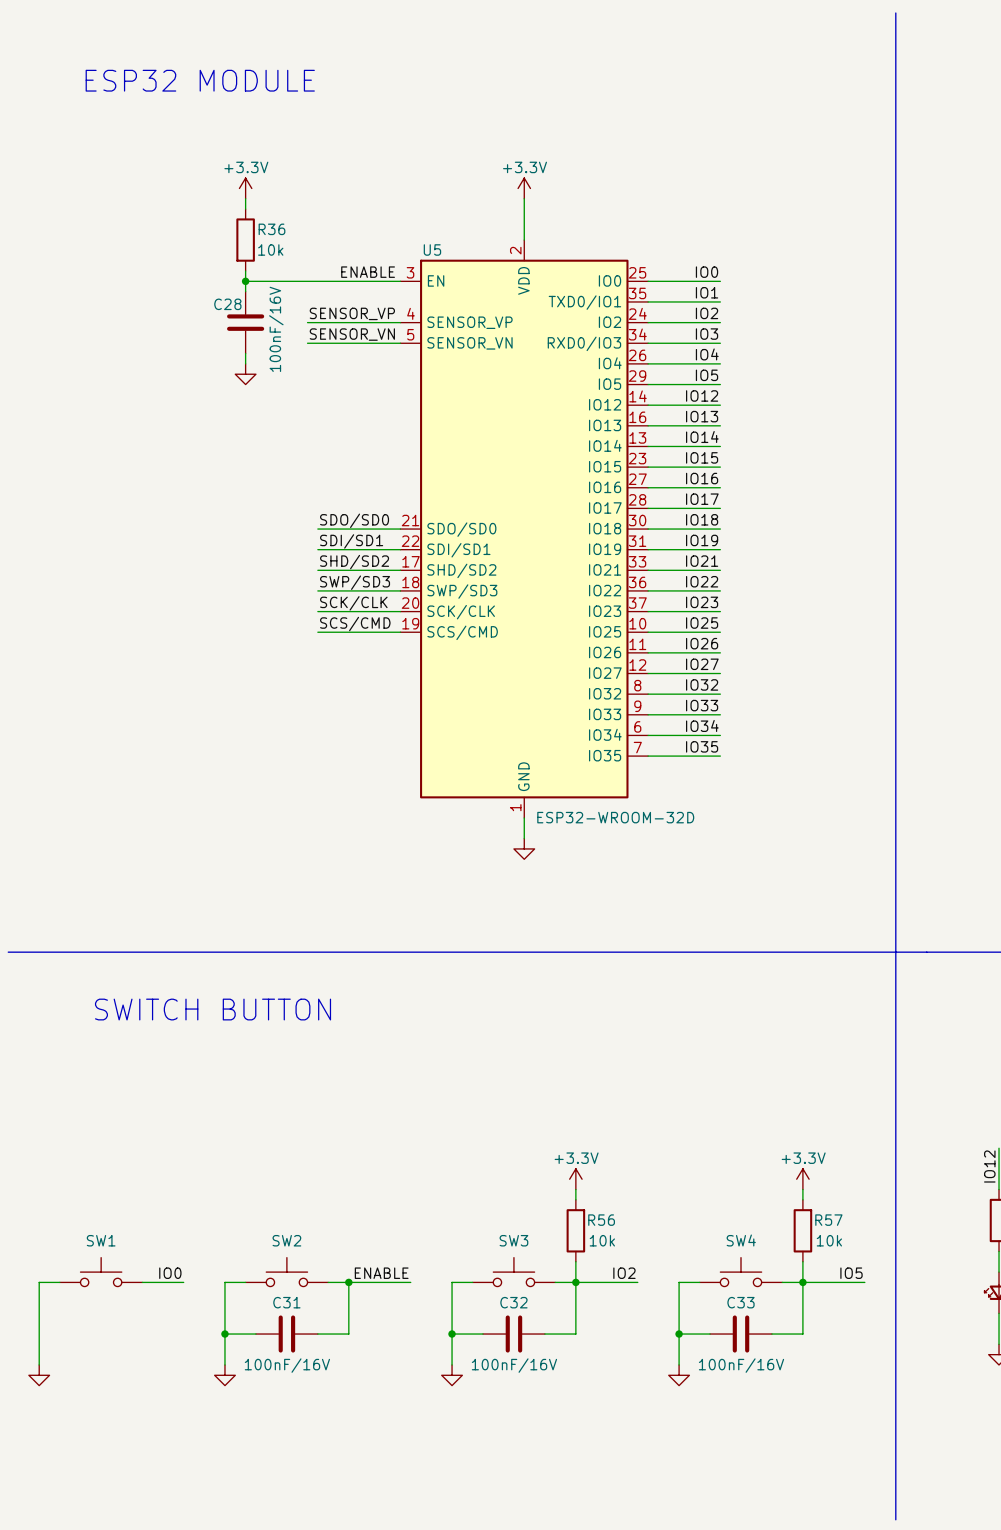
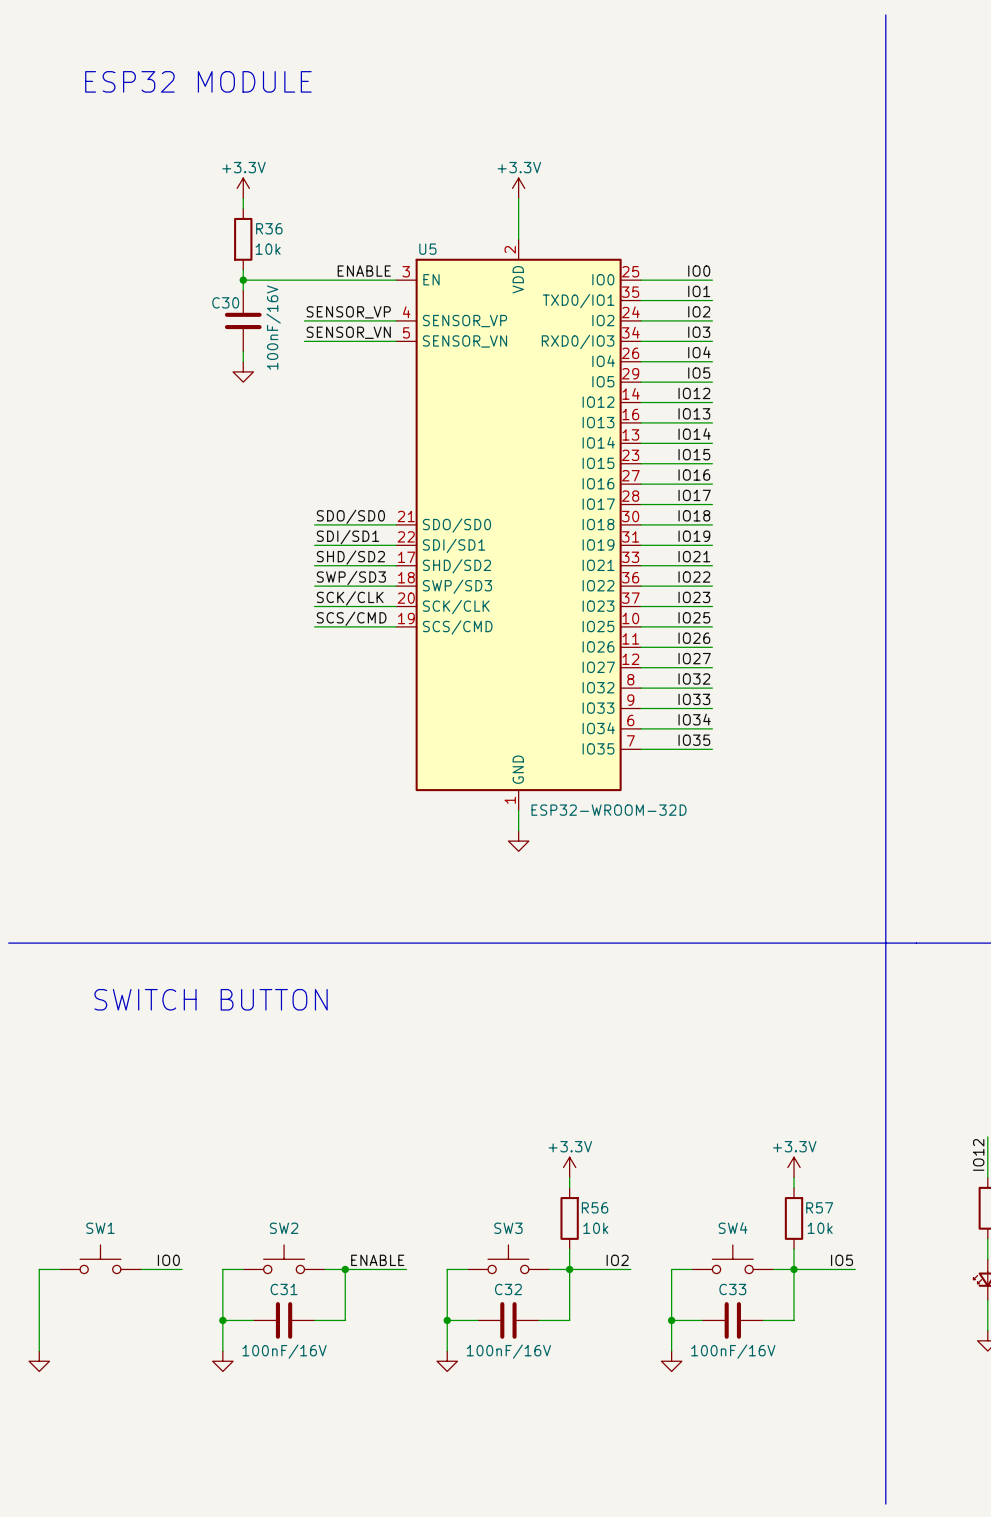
C28 name: C28 (227, 304) -> C30 (225, 302)

